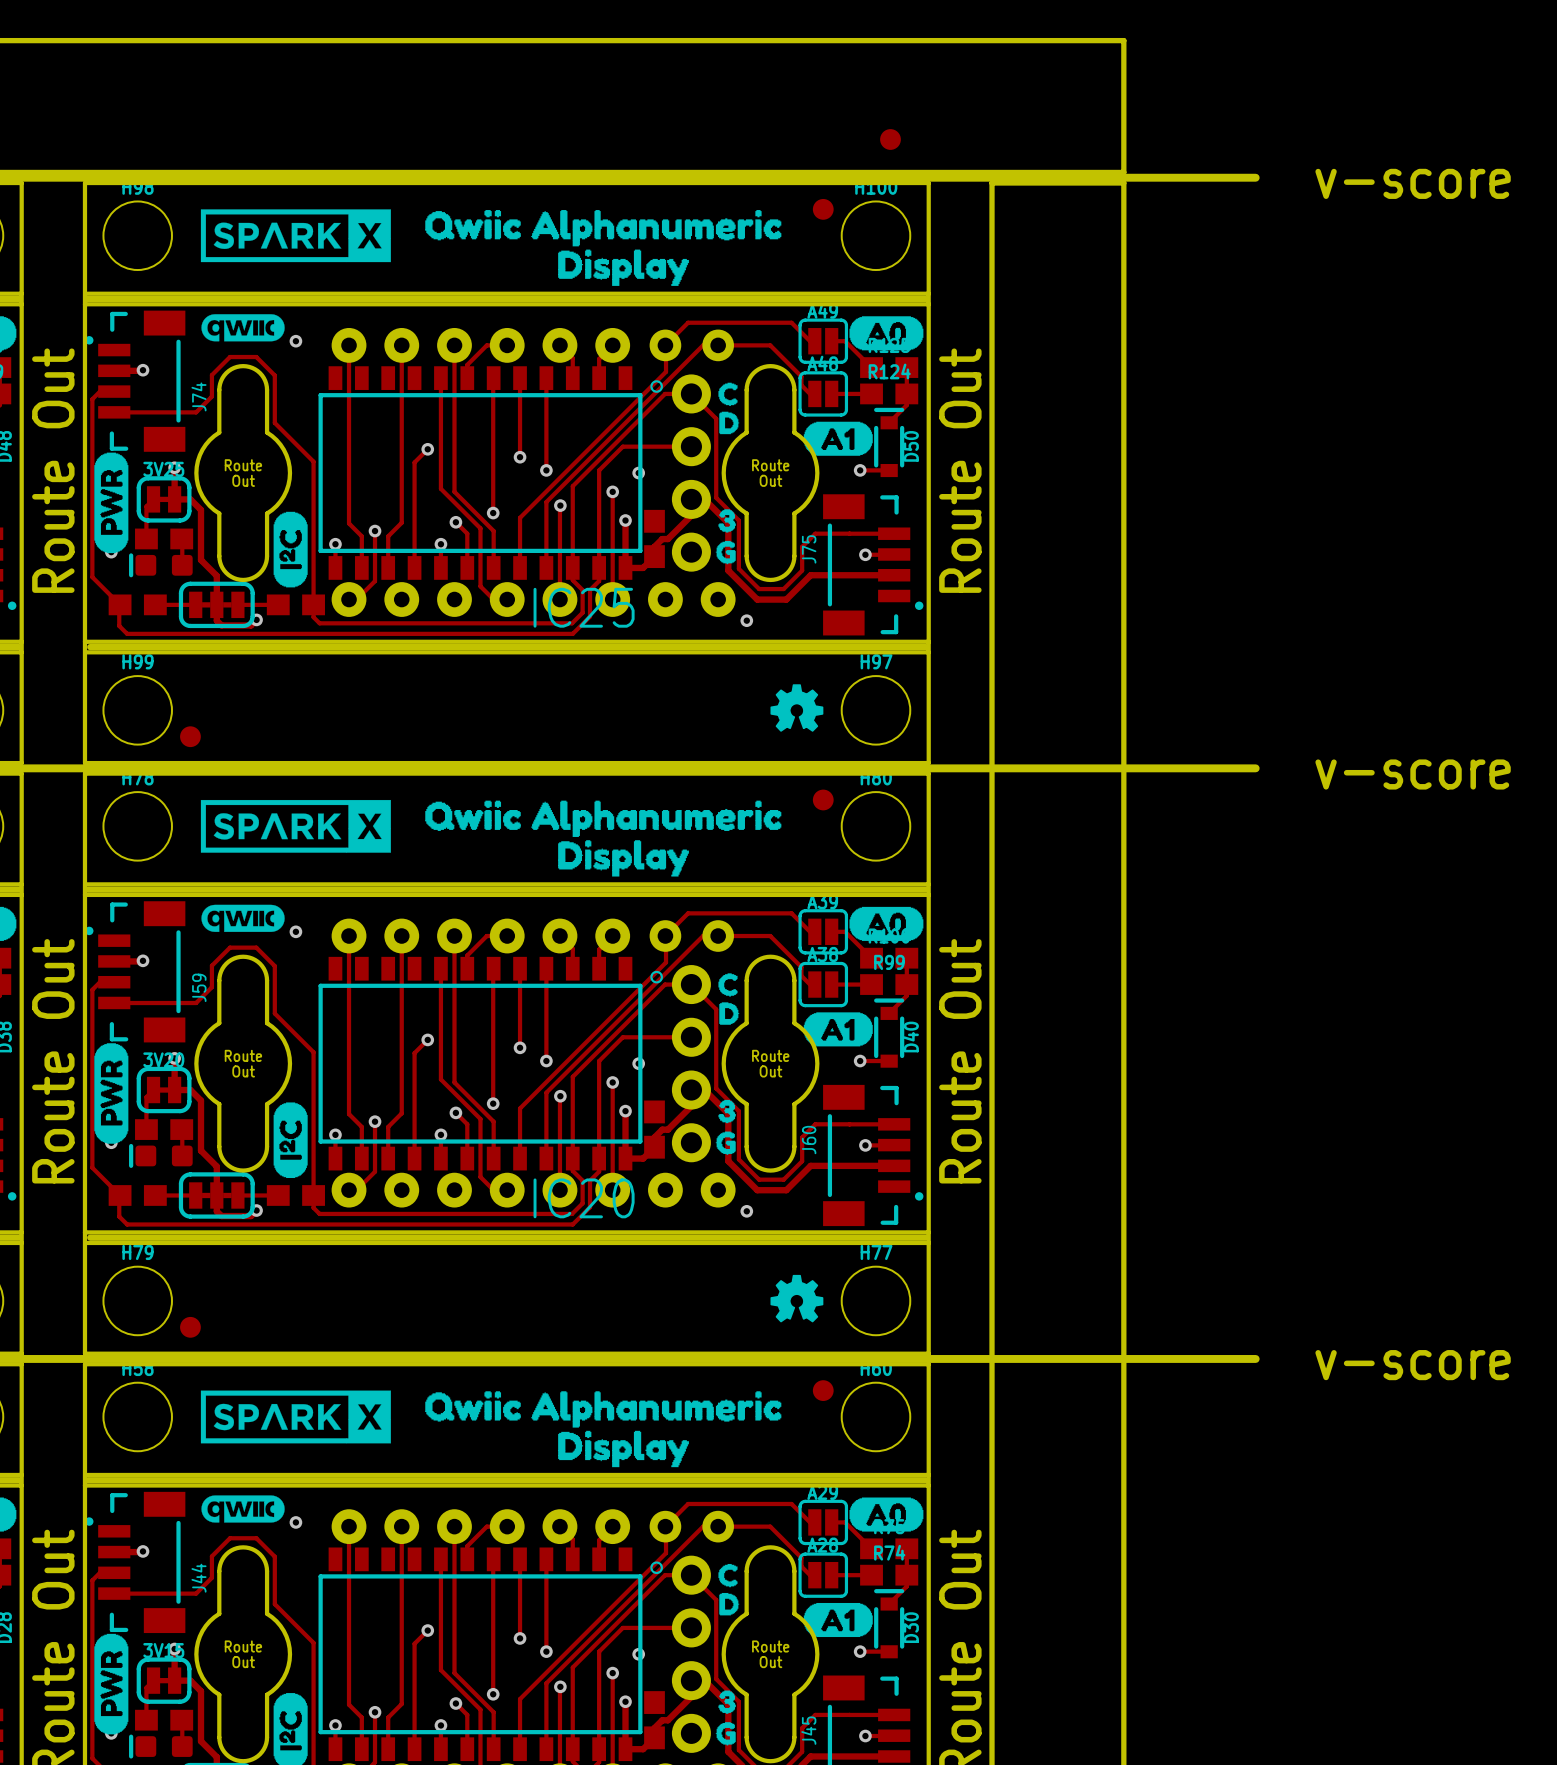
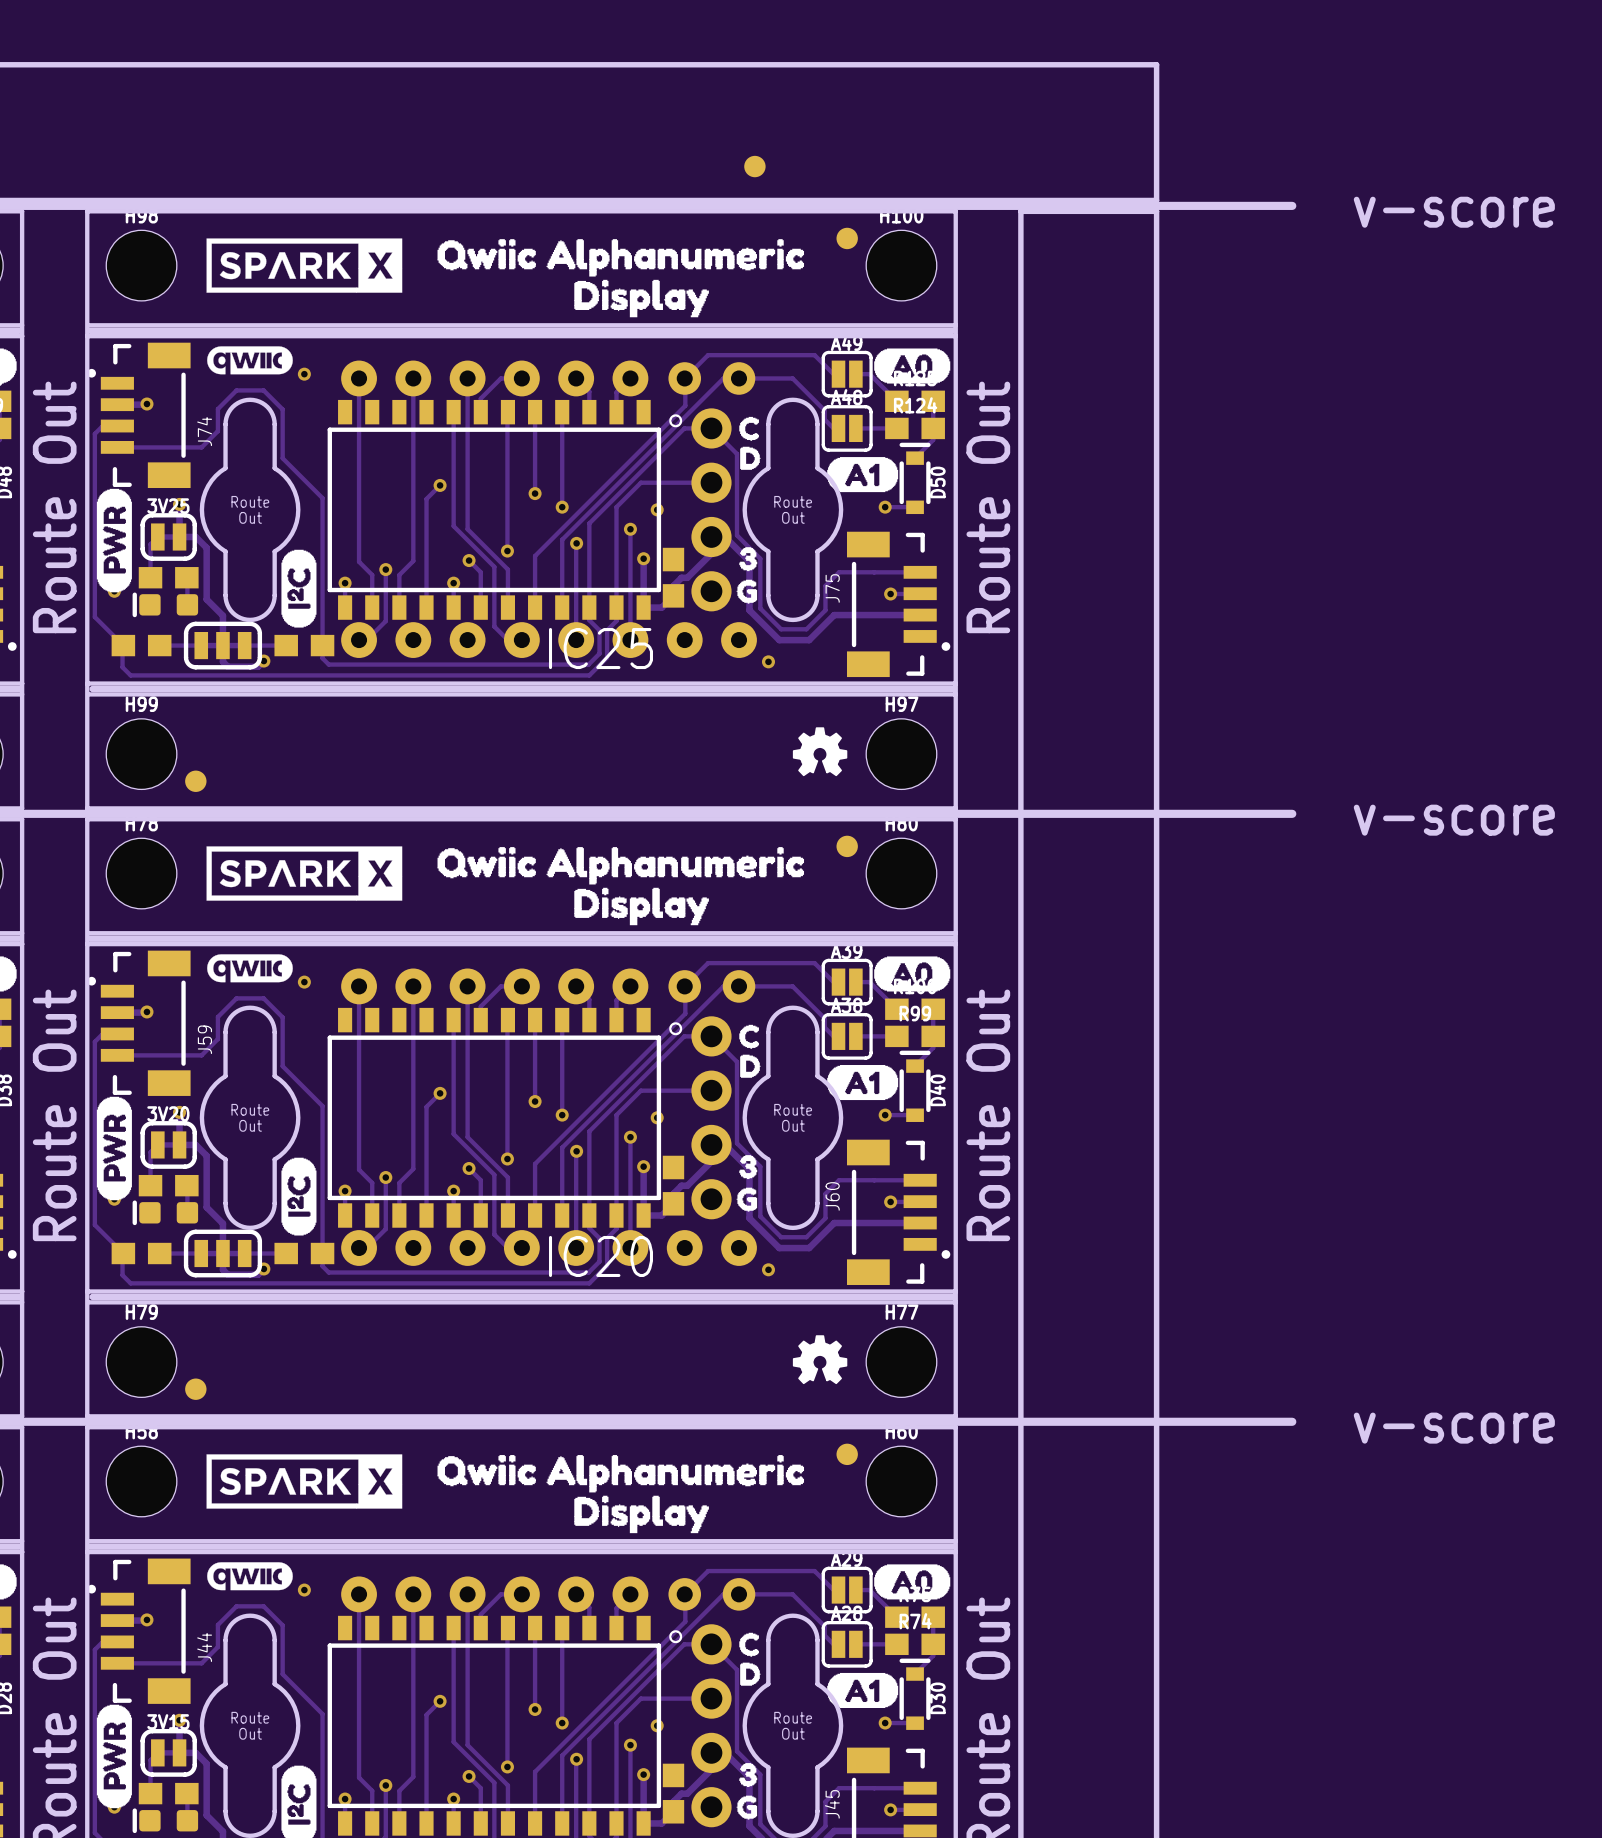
part position: (890, 139) -> (754, 166)

